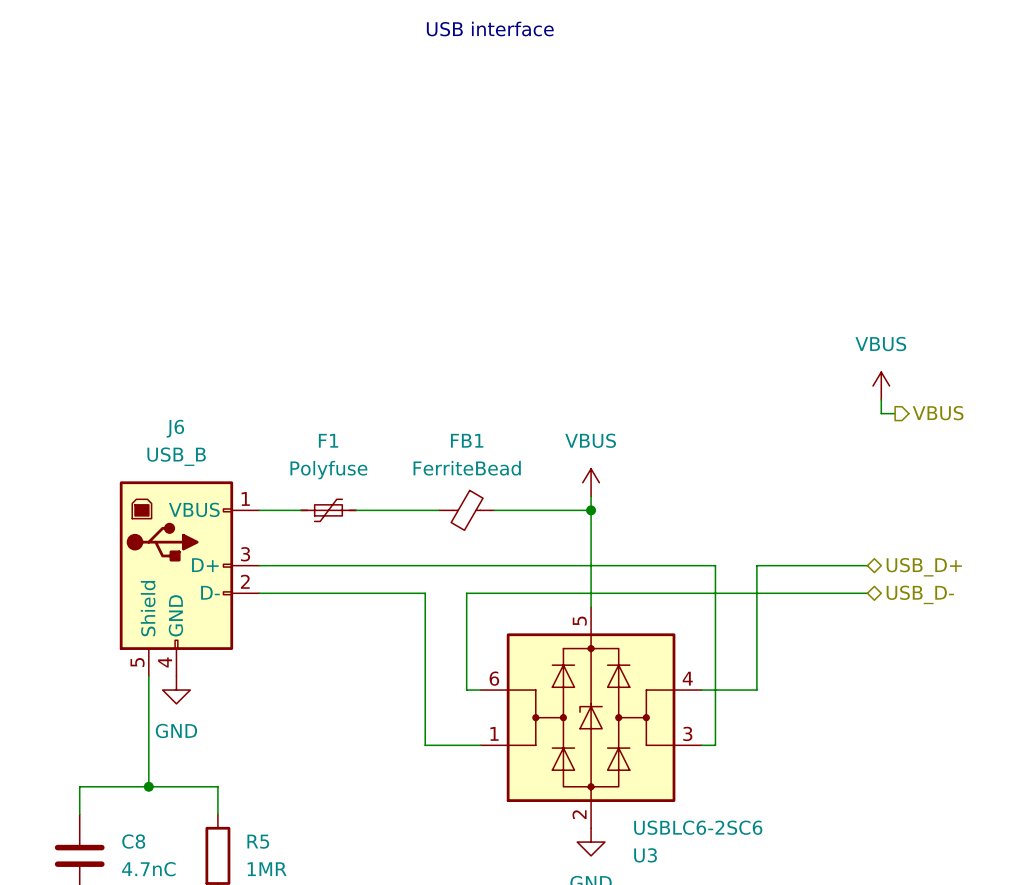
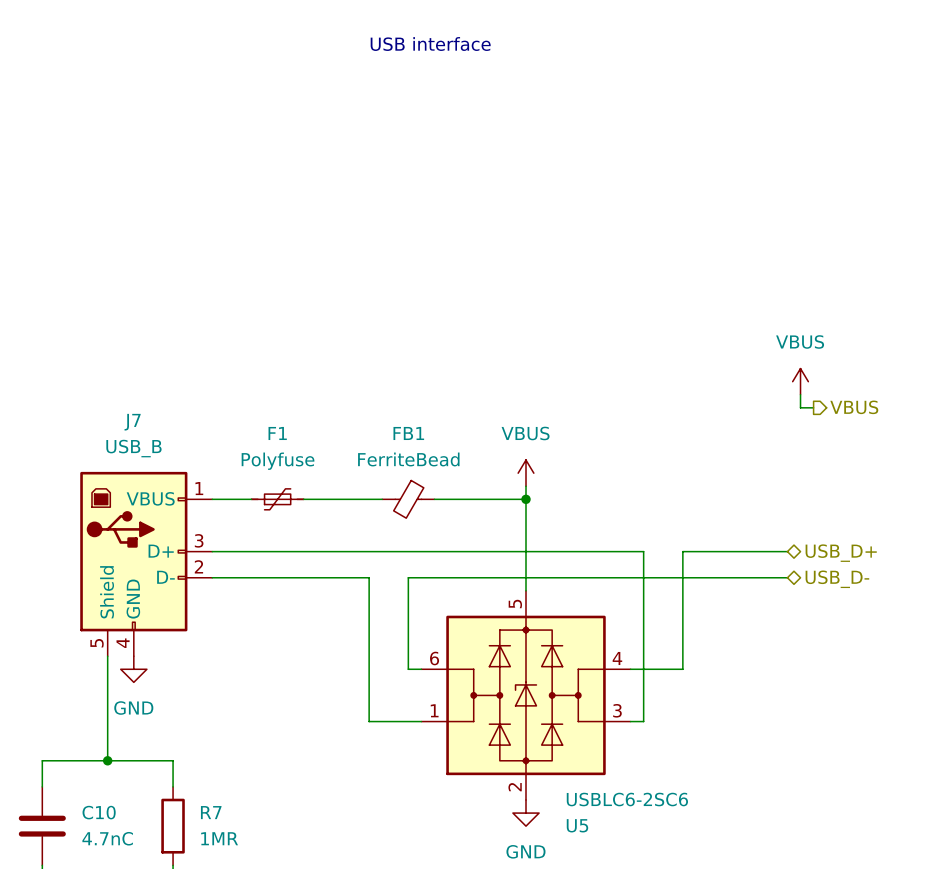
J6 name: J6 (175, 428) -> J7 (132, 422)
C8 name: C8 (133, 841) -> C10 (99, 812)
R5 name: R5 (258, 841) -> R7 (211, 812)
U3 name: U3 (645, 855) -> U5 (577, 825)

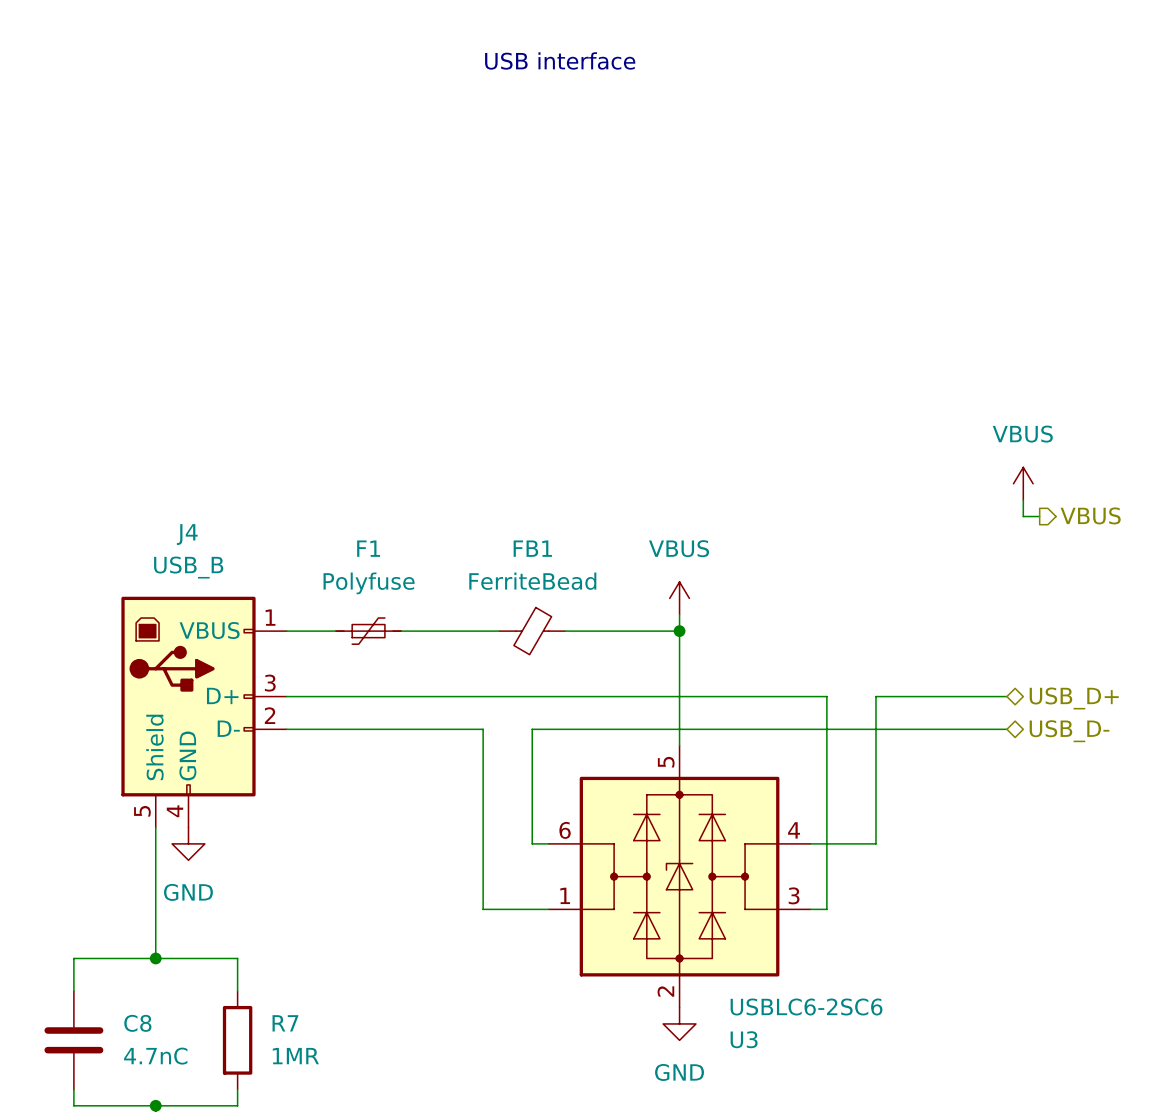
J7 name: J7 (132, 422) -> J4 (187, 534)
C10 name: C10 (99, 812) -> C8 (137, 1023)
U5 name: U5 (577, 825) -> U3 (744, 1039)

